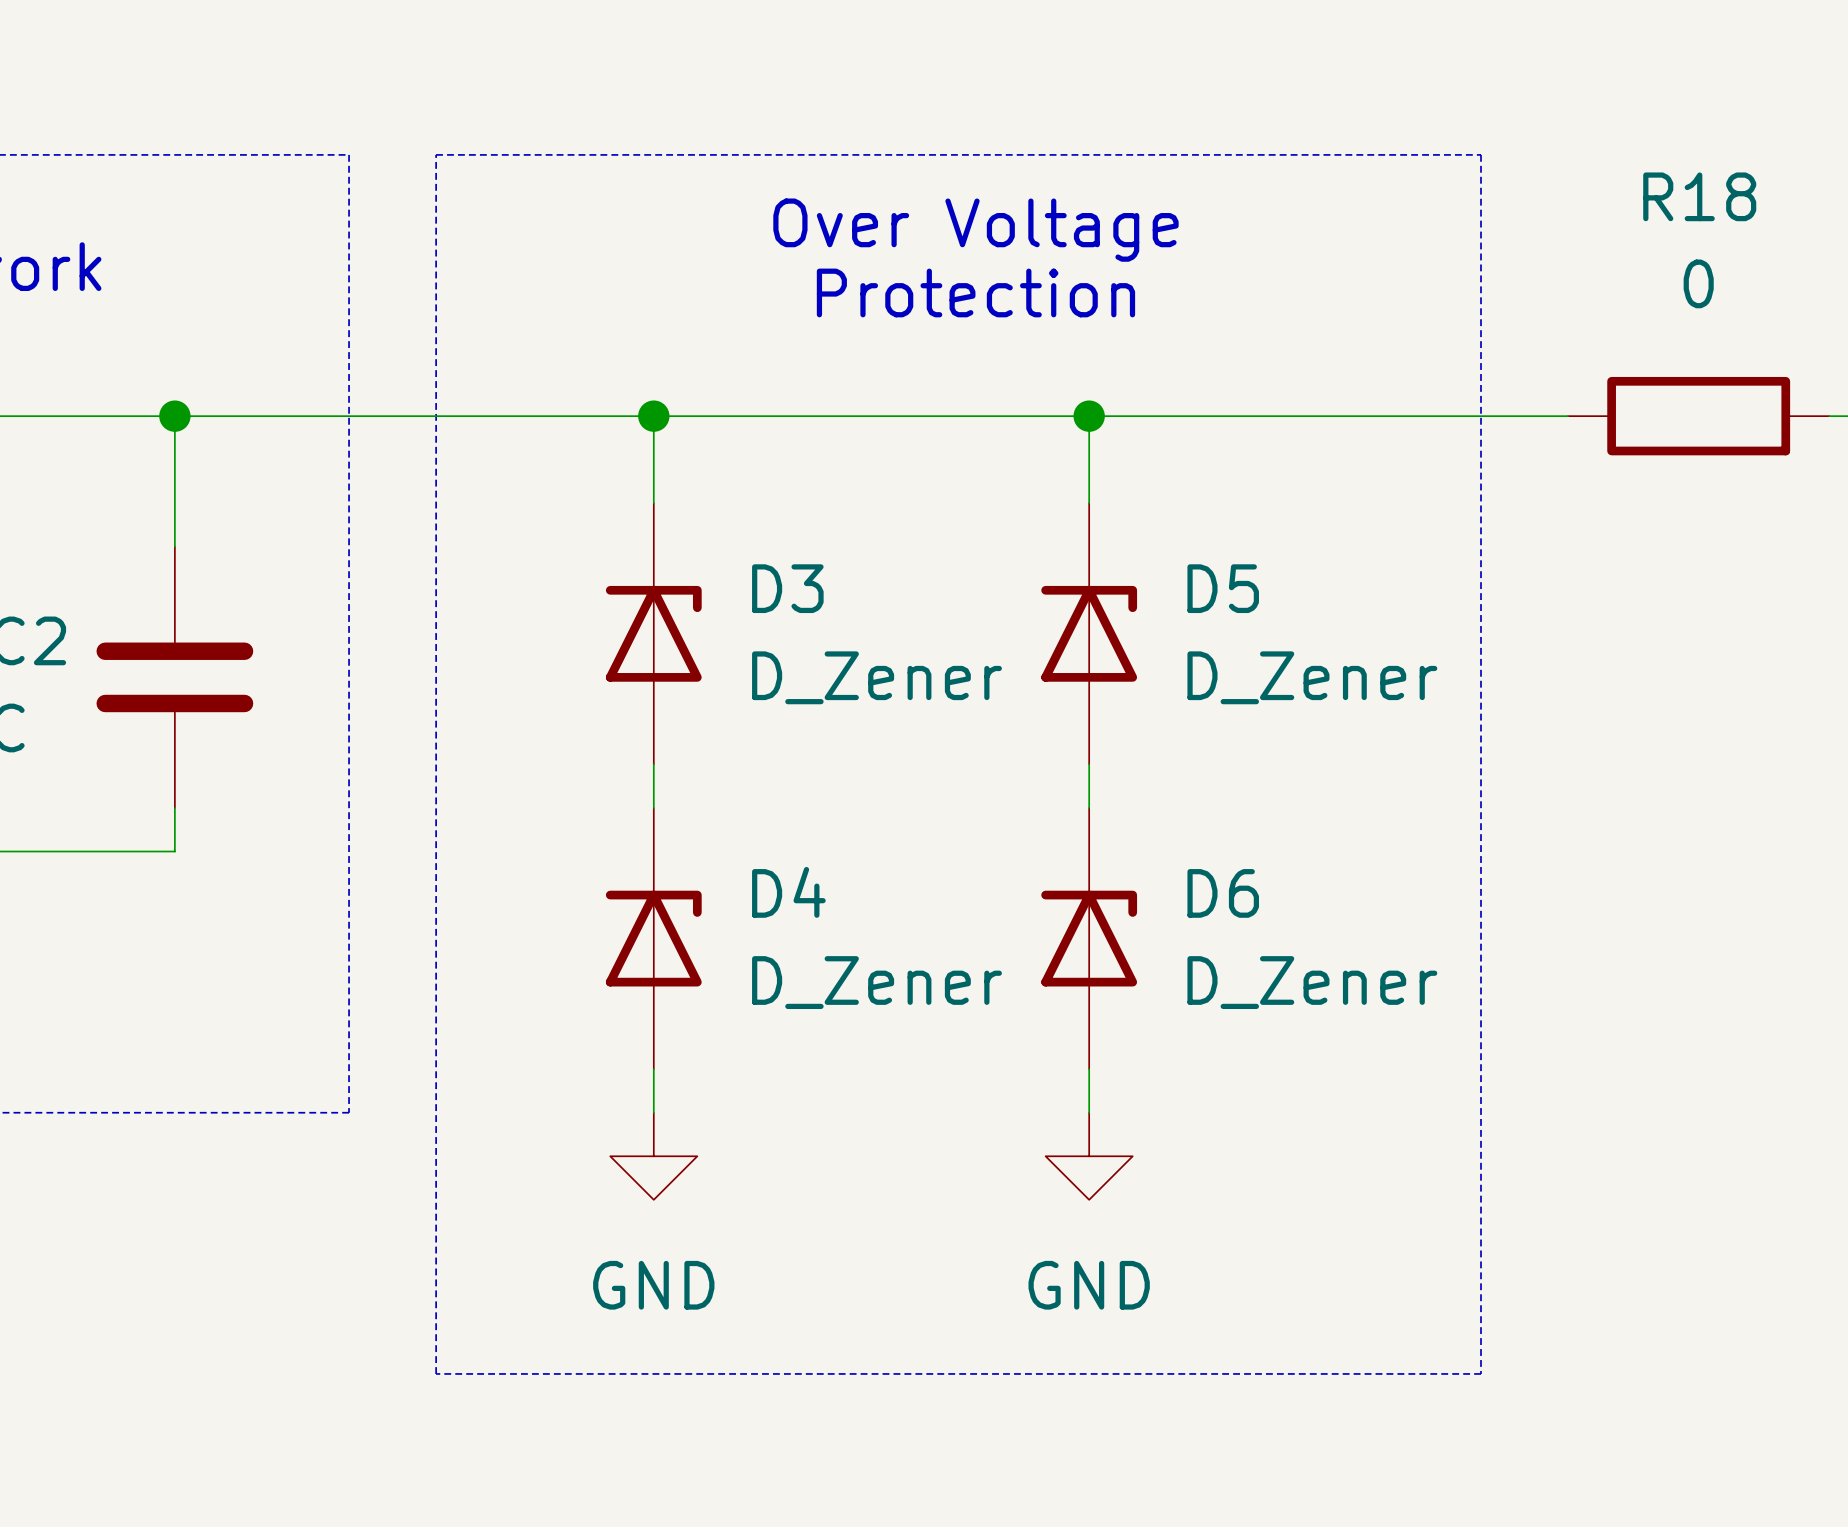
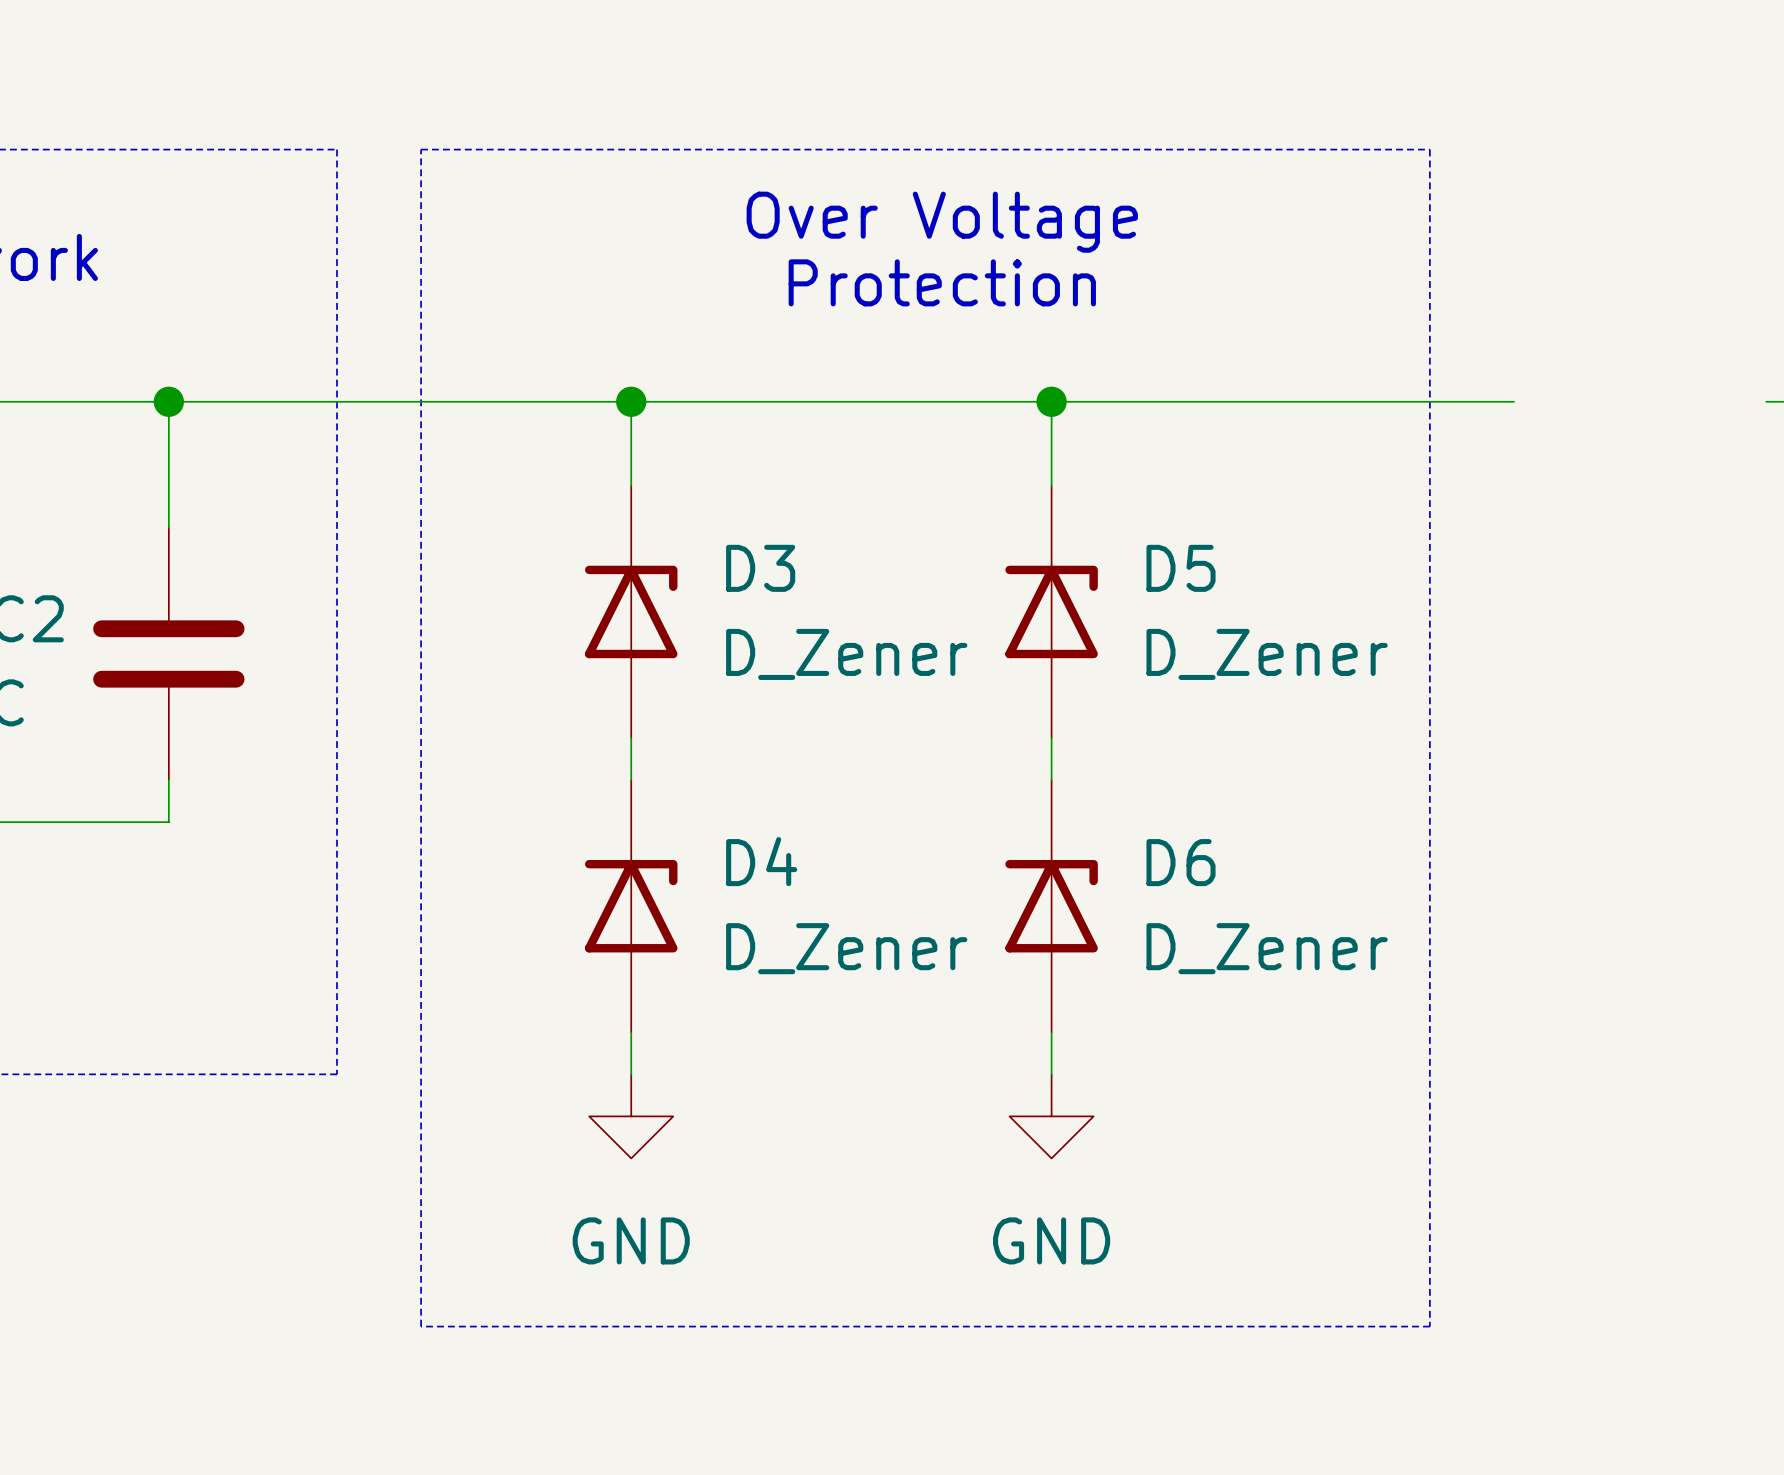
R18: 0 (1698, 416) -> none

